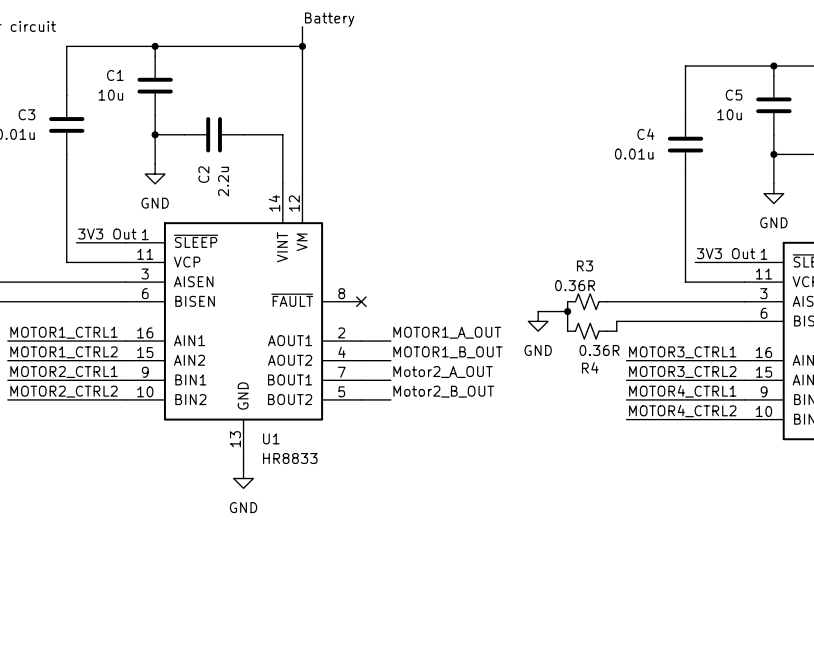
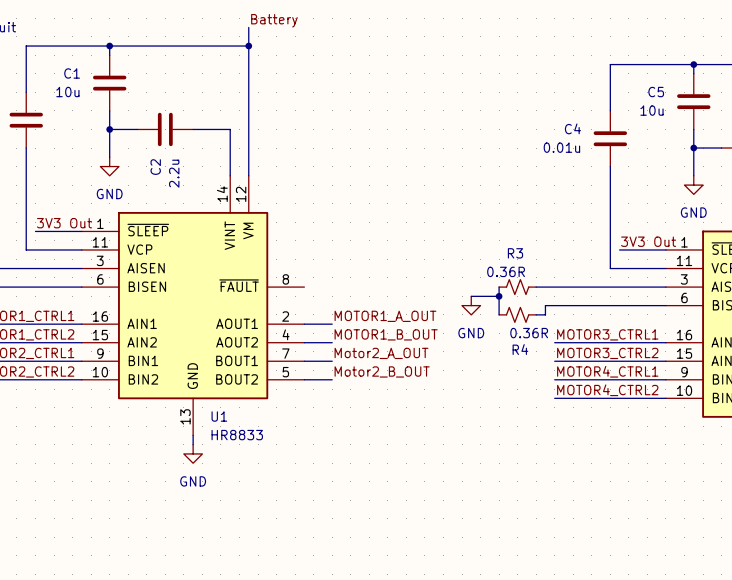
no-connect mark: (361, 301) -> none

